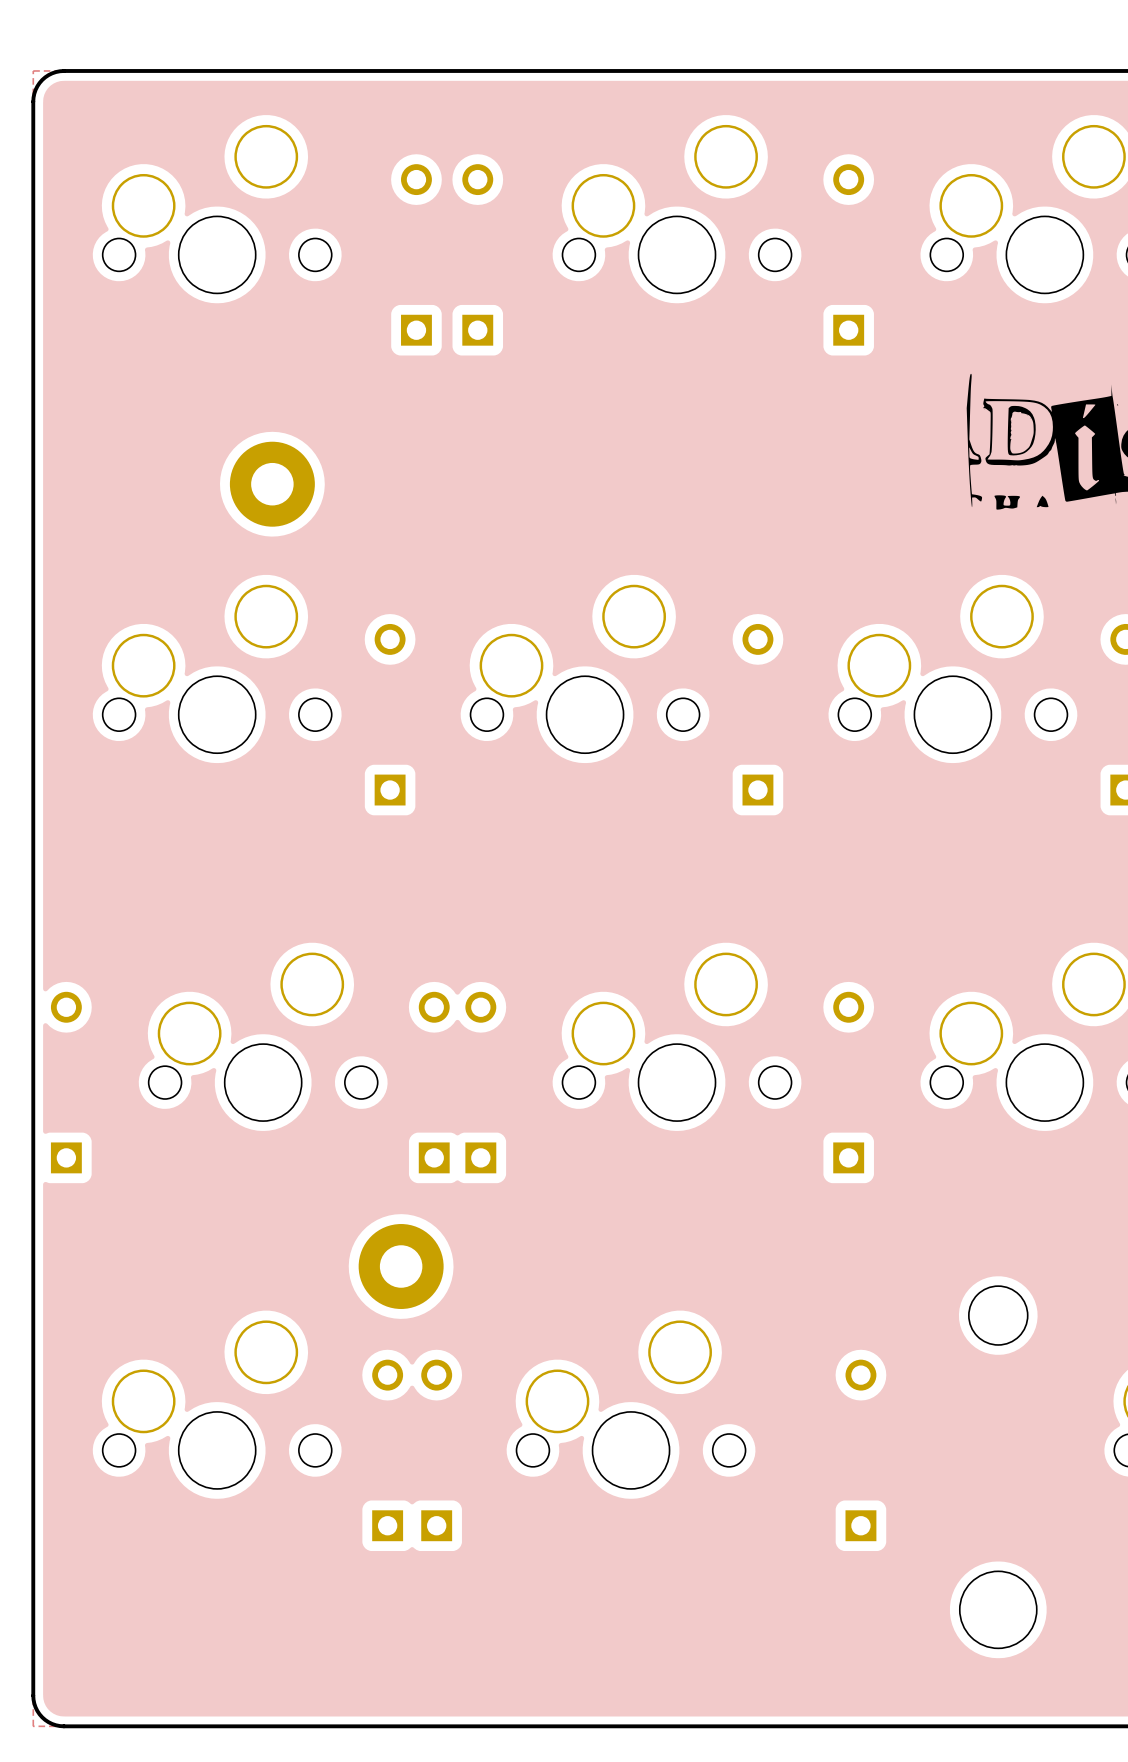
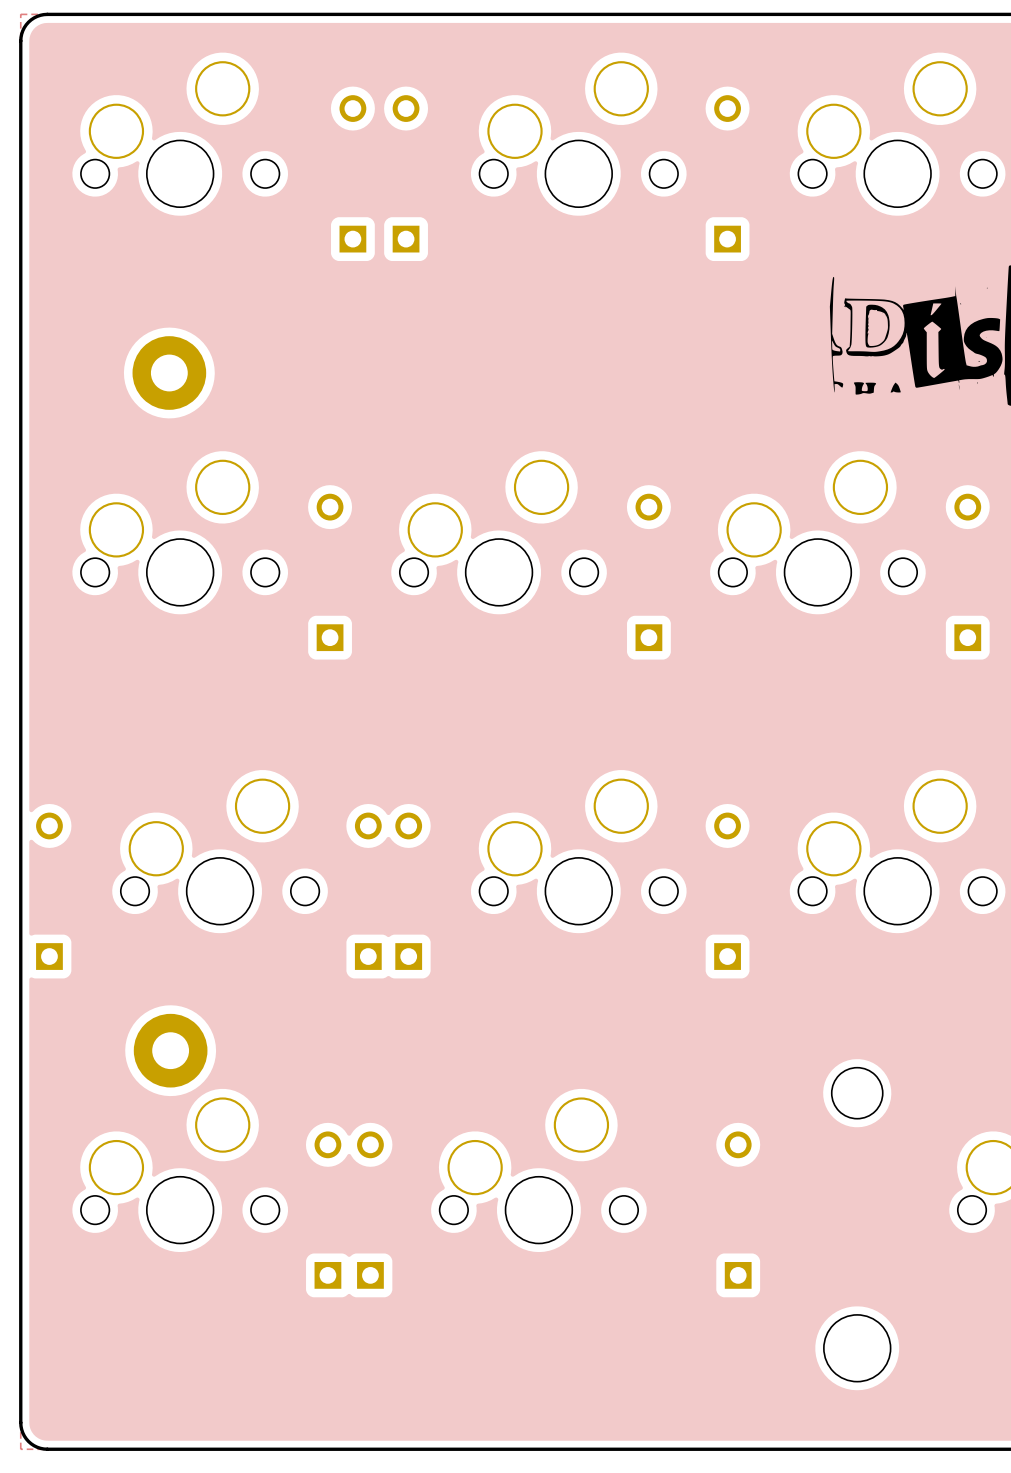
part position: (272, 484) -> (169, 373)
part position: (401, 1266) -> (170, 1050)

